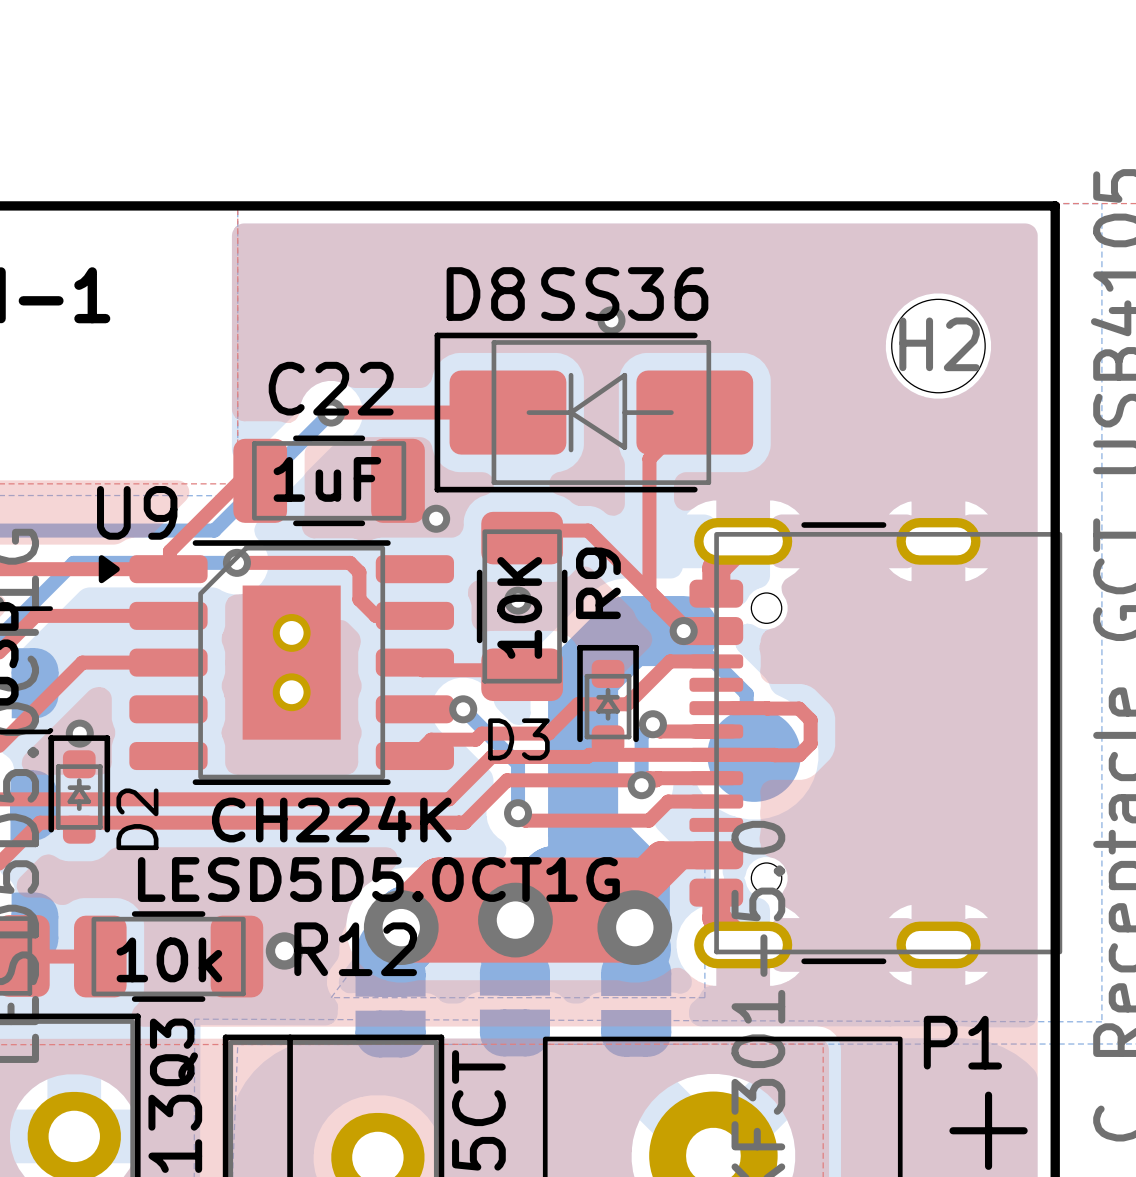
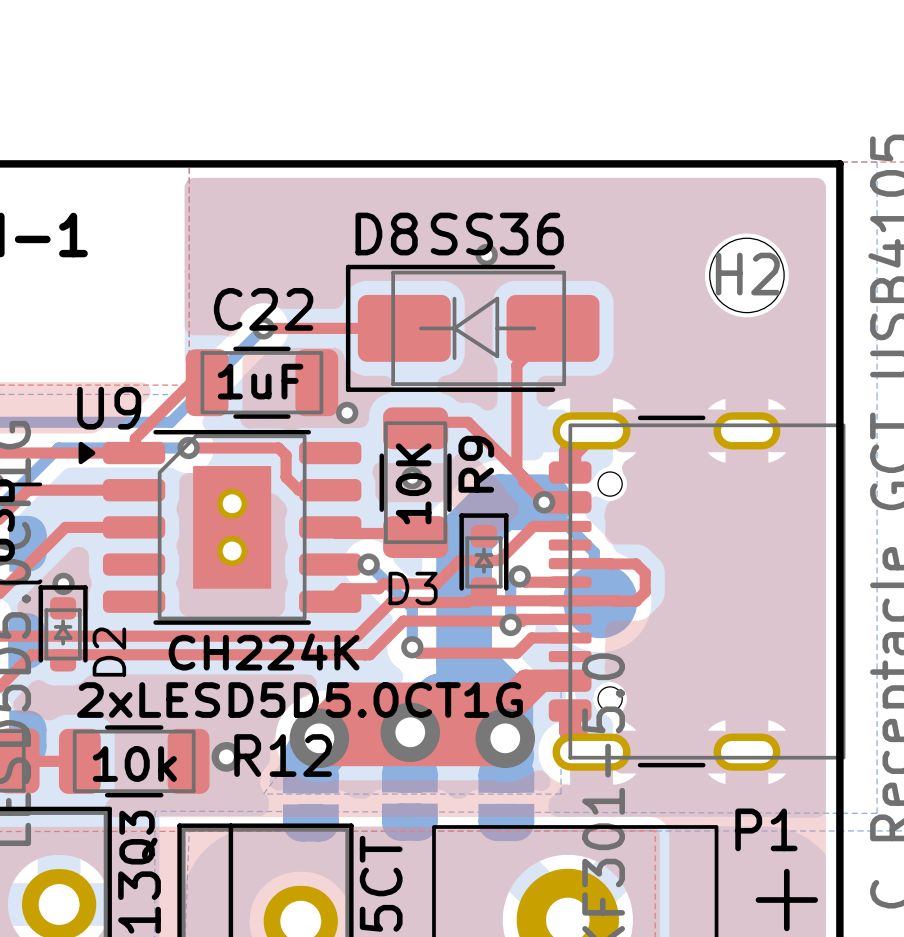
D3 value: LESD5D5.0CT1G (378, 879) -> 2xLESD5D5.0CT1G (299, 700)

